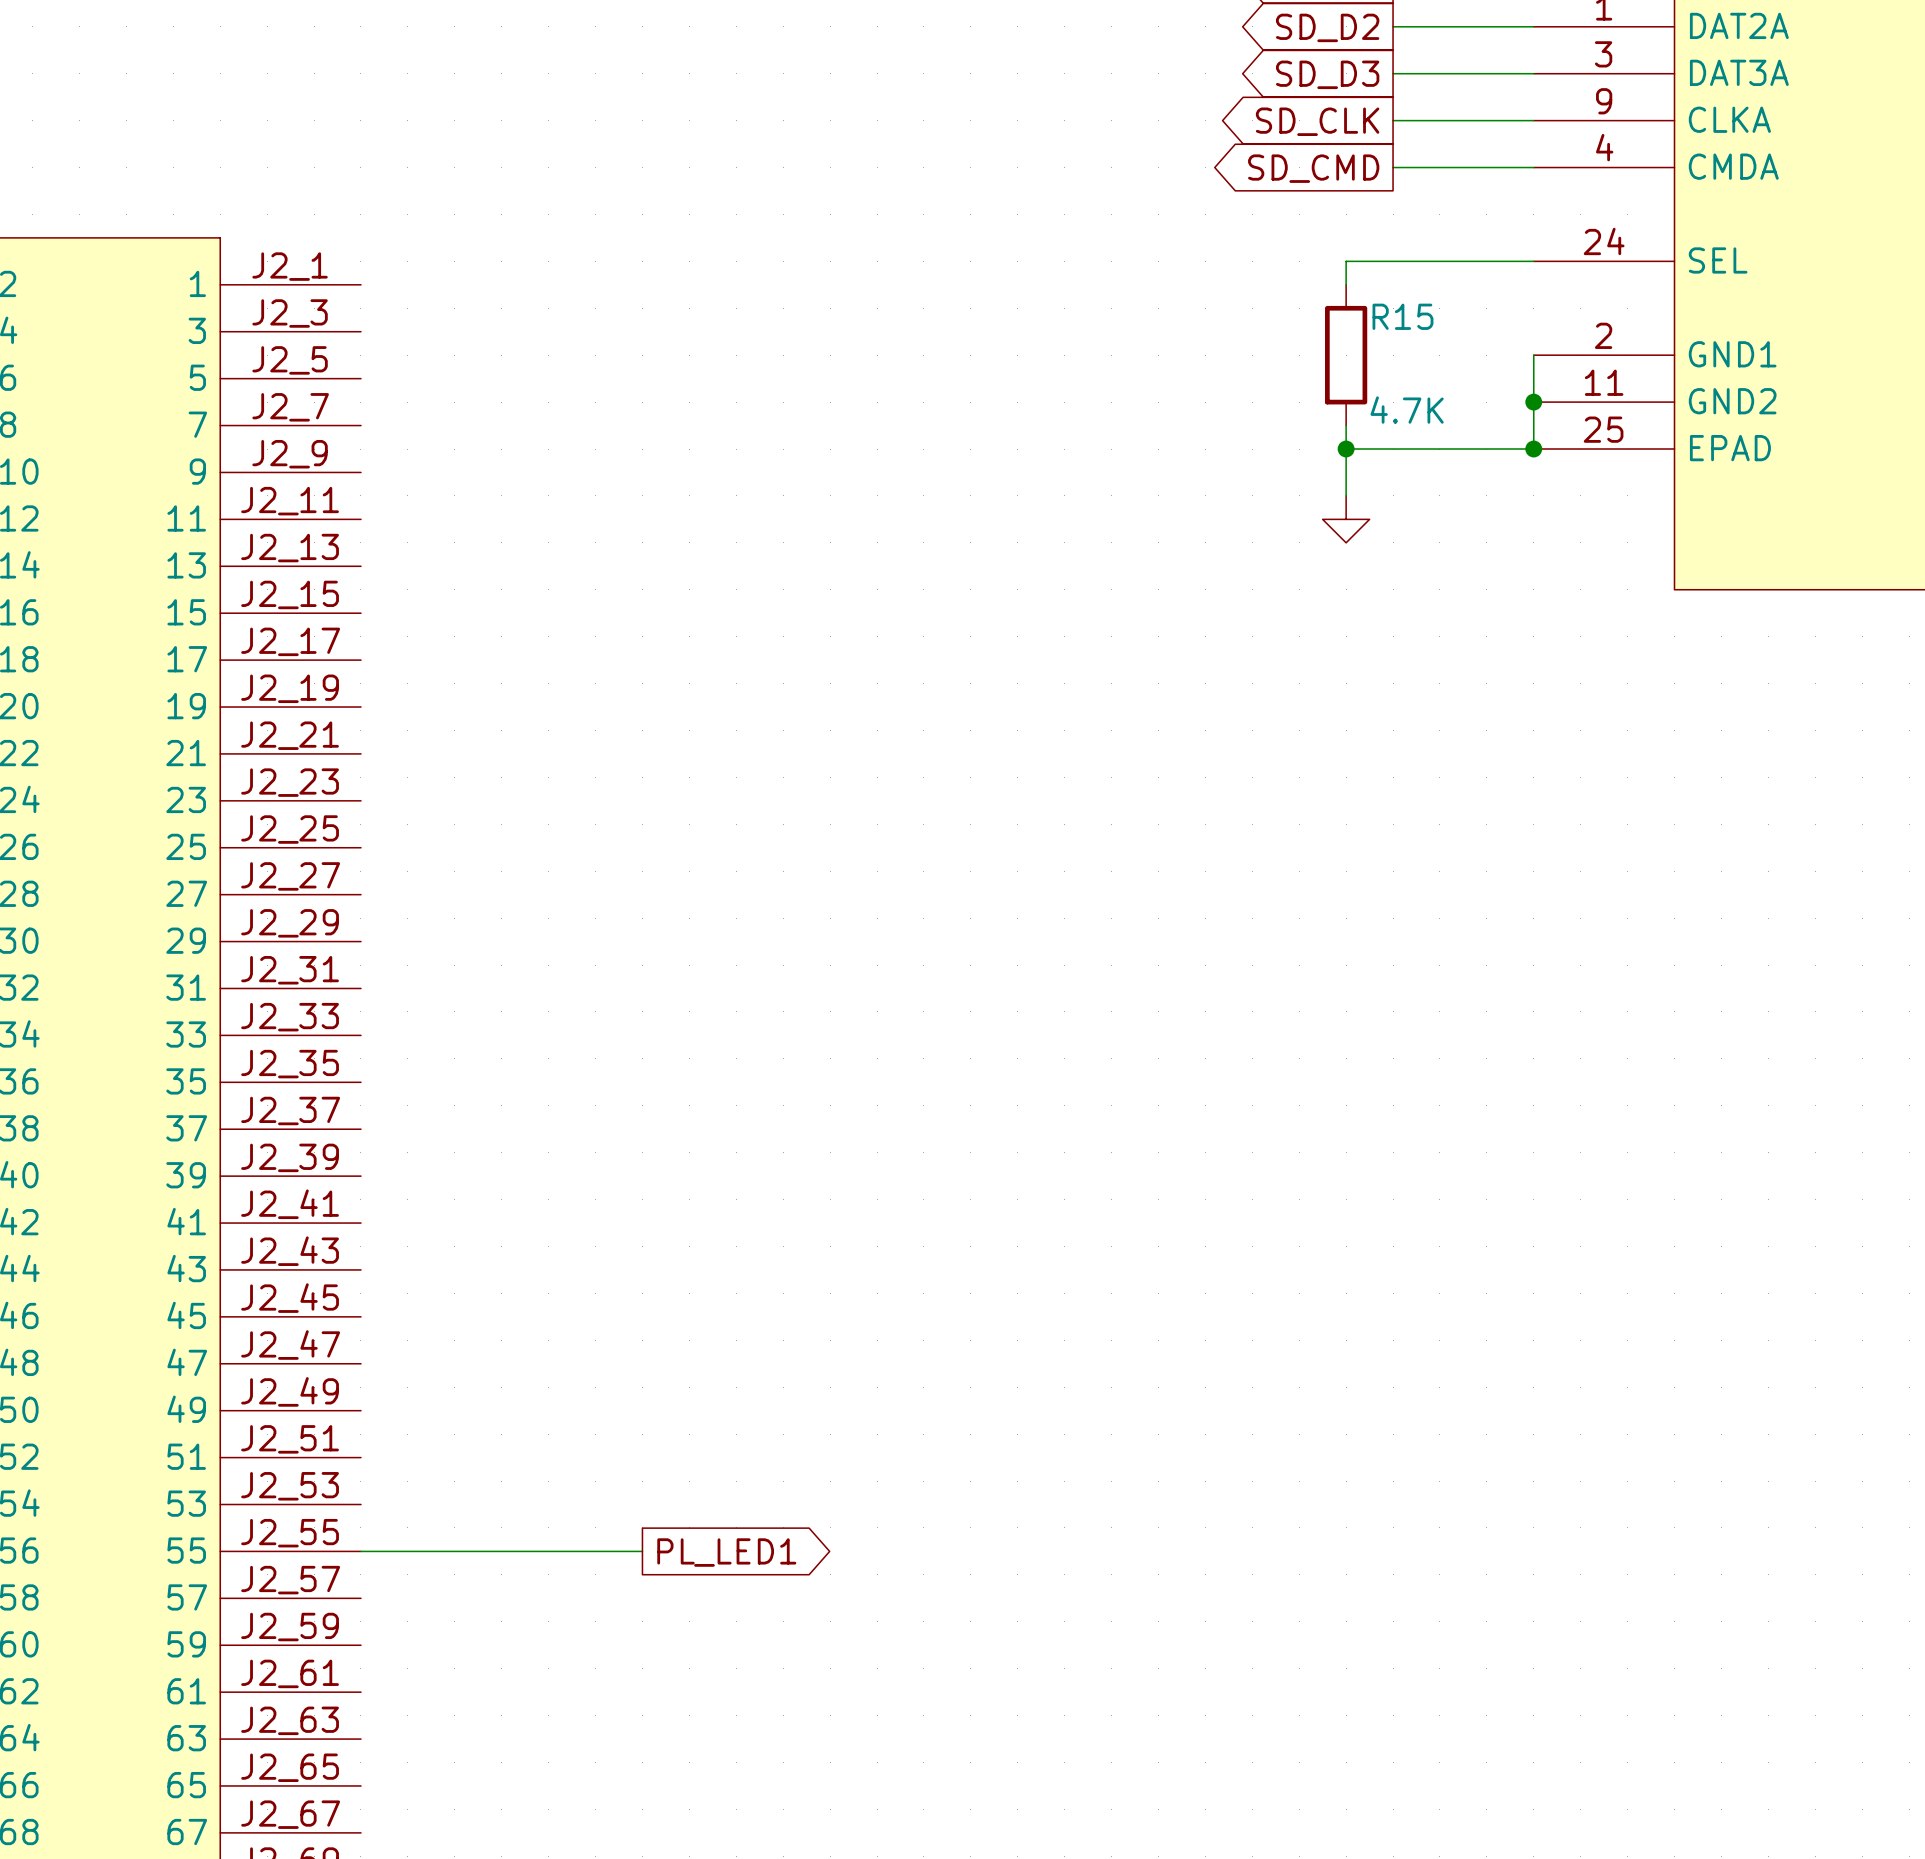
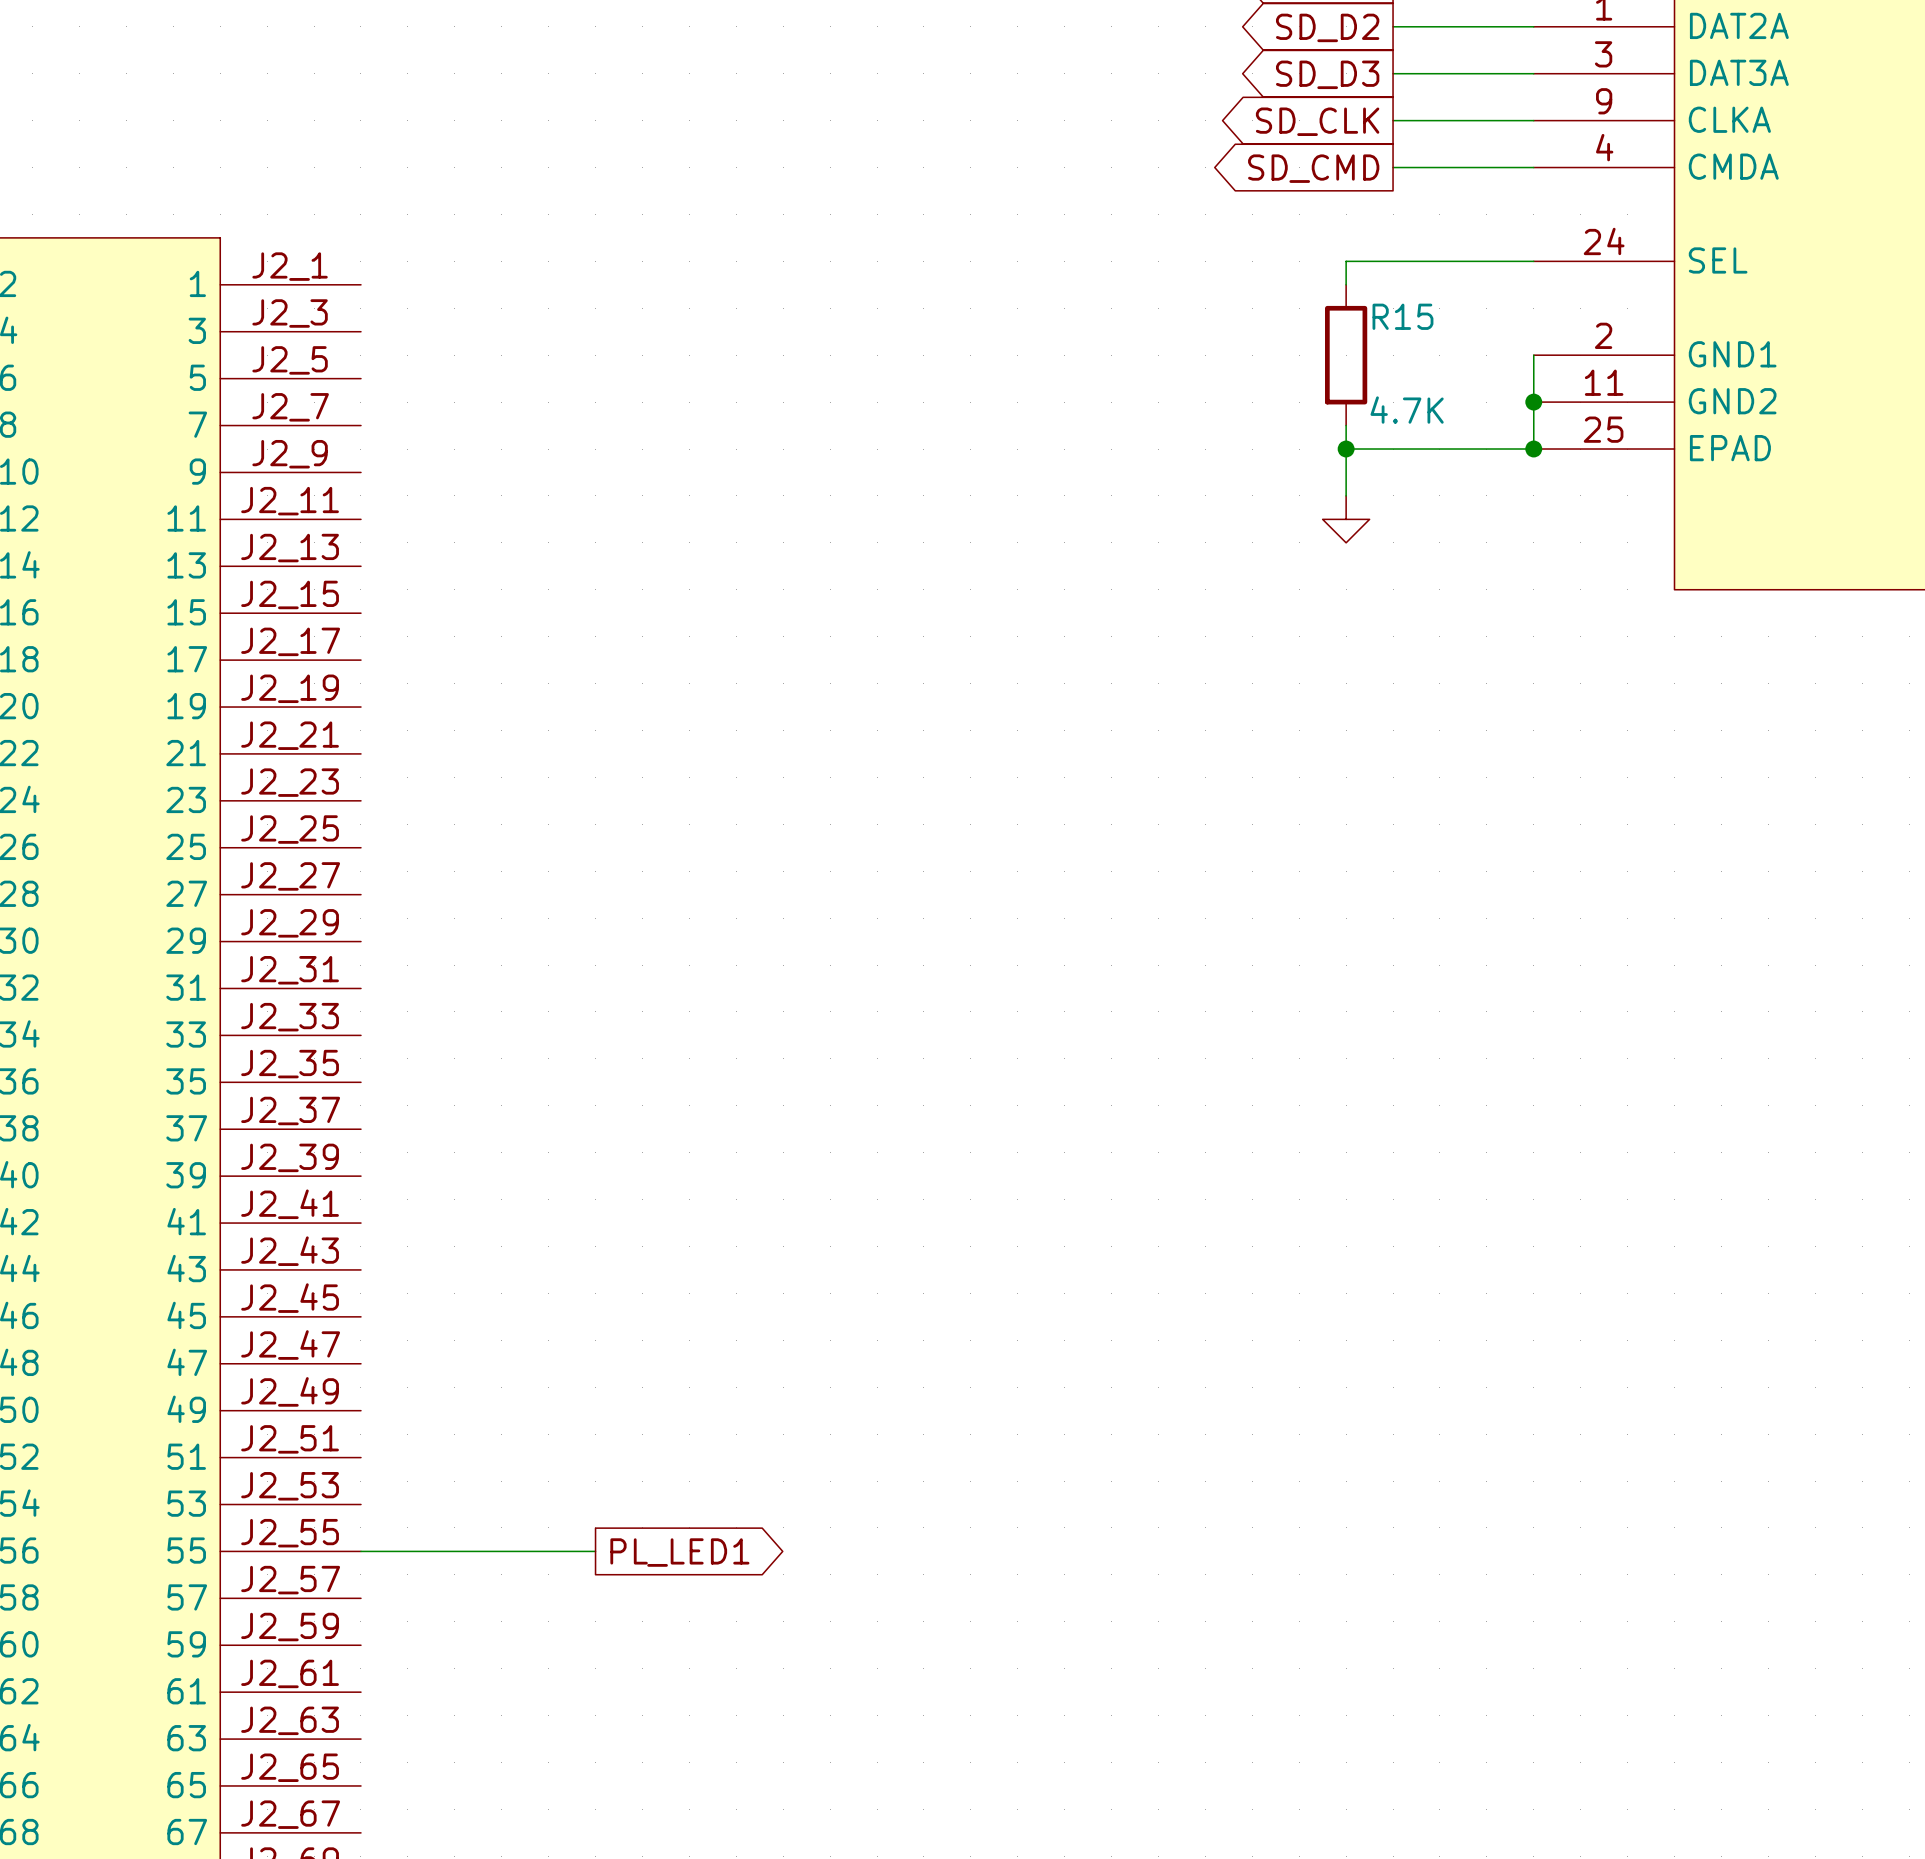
wire: (595, 1551) (642, 1551) -> none
global label position: PL_LED1 (726, 1552) -> PL_LED1 (679, 1552)

